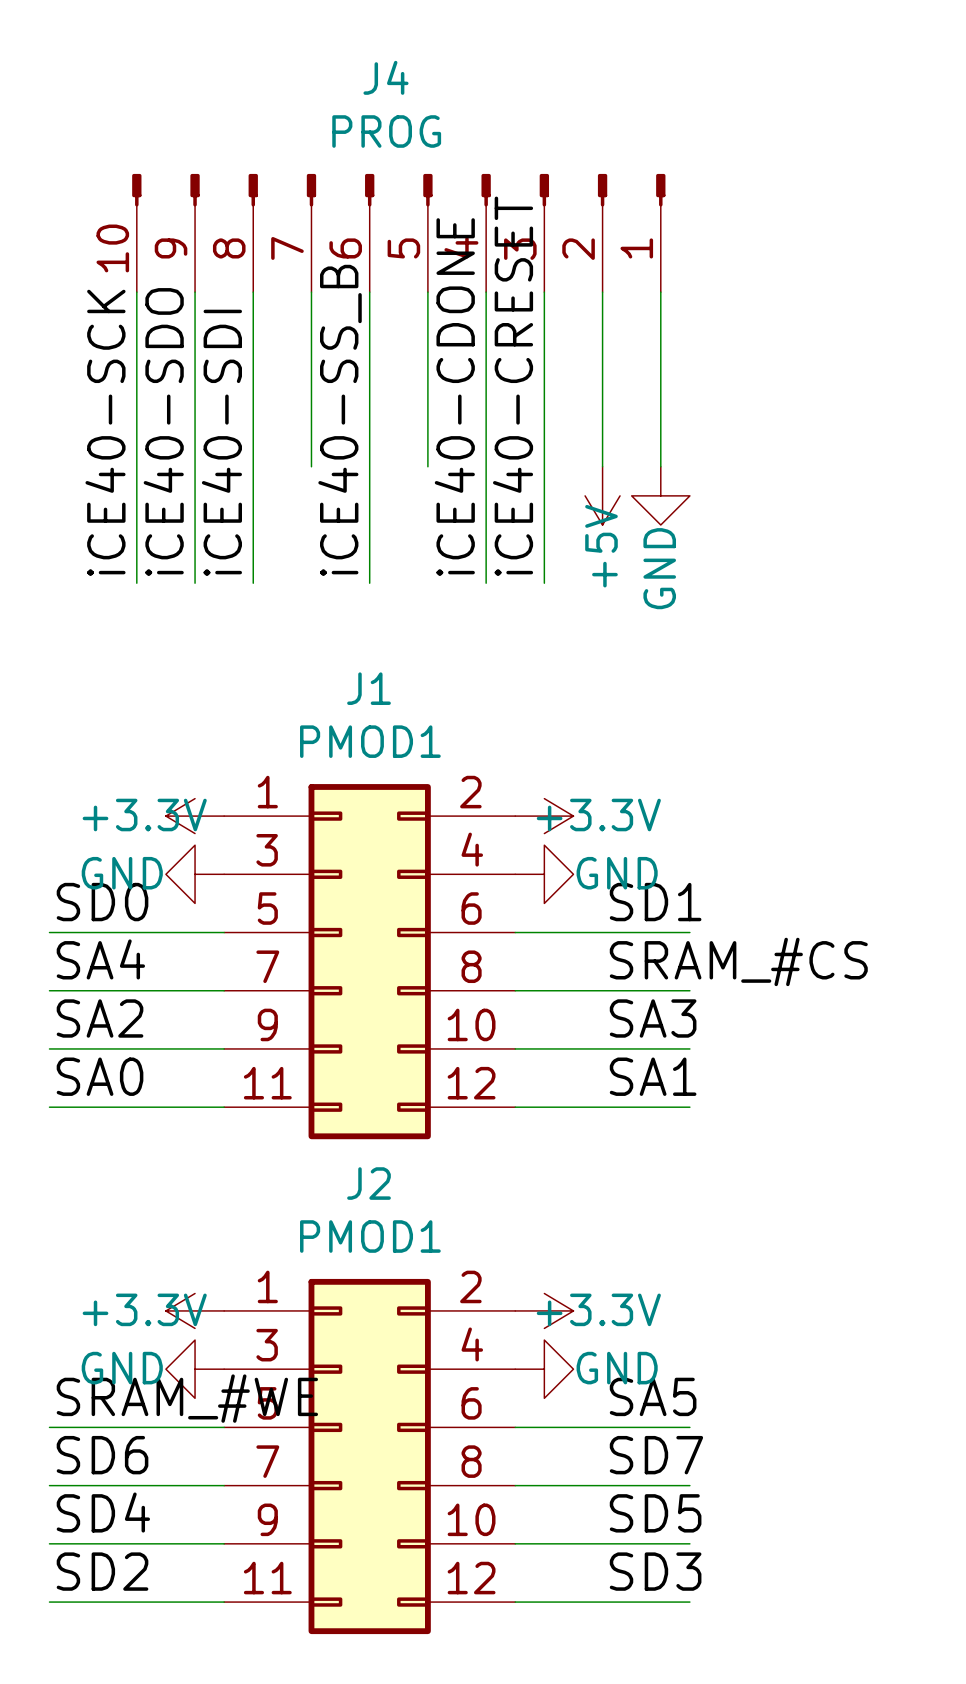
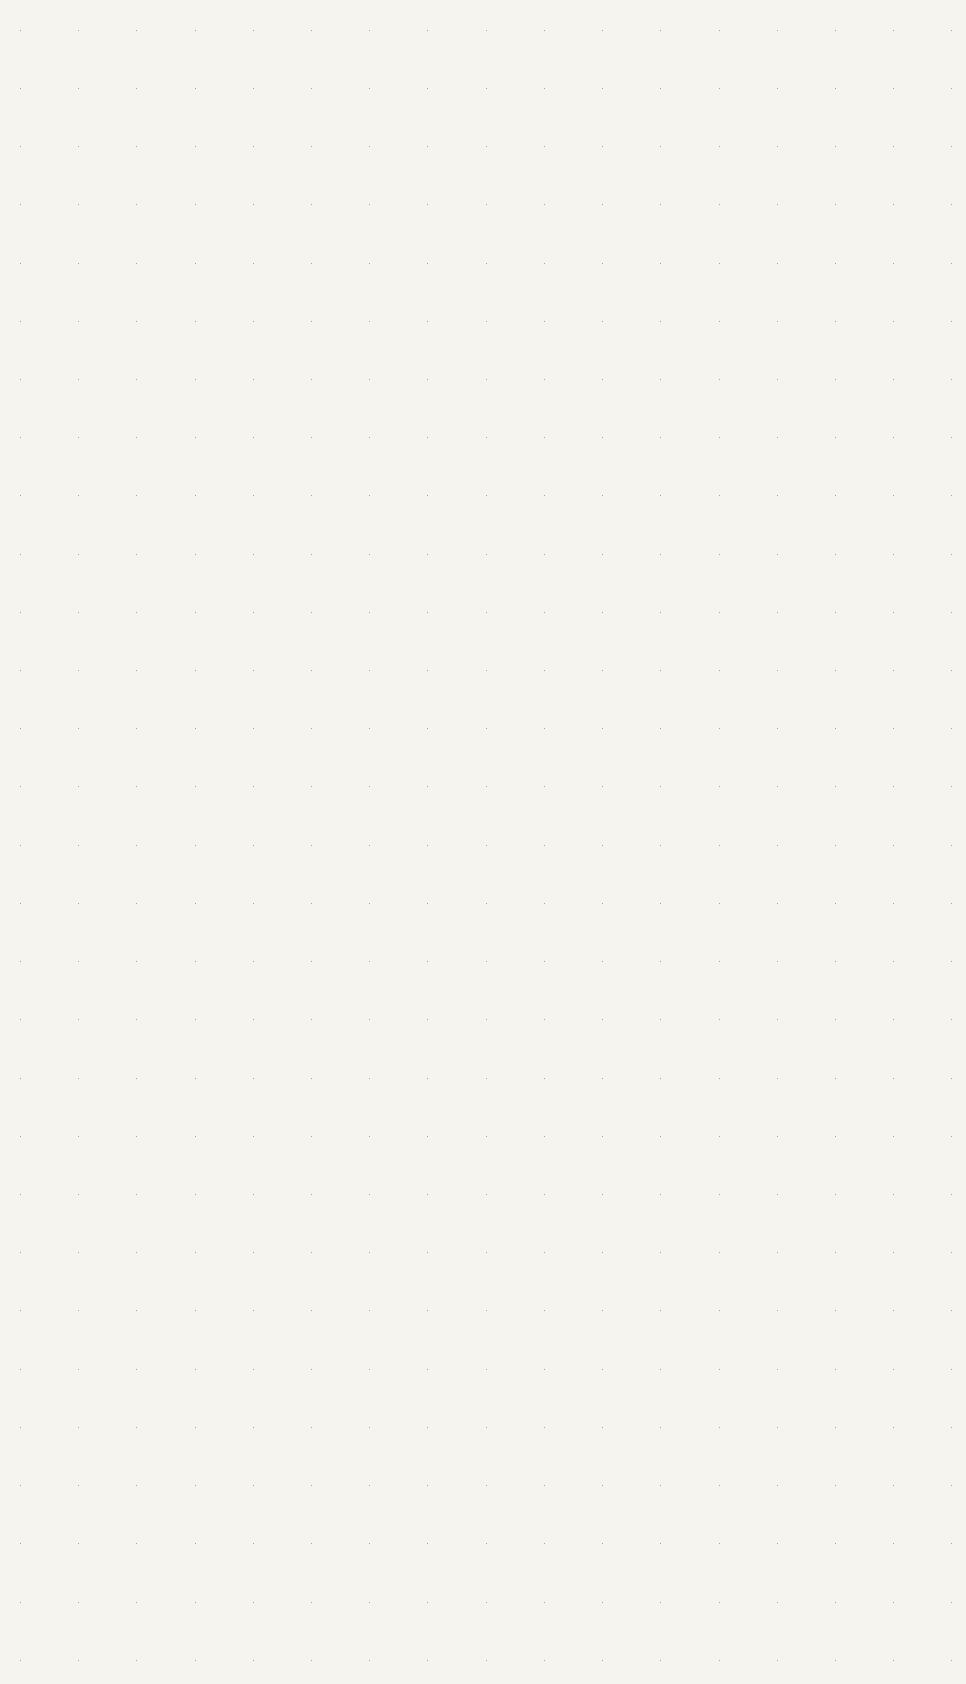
J4: PROG (398, 233) -> none
wire: (136, 292) (136, 583) -> none
wire: (195, 292) (195, 583) -> none
wire: (253, 292) (253, 583) -> none
wire: (311, 292) (311, 466) -> none
wire: (369, 292) (369, 583) -> none
wire: (427, 292) (427, 466) -> none
wire: (486, 292) (486, 583) -> none
wire: (544, 292) (544, 583) -> none
wire: (602, 292) (602, 466) -> none
wire: (660, 292) (660, 466) -> none
label: iCE40-CRESET (513, 386) -> none
label: iCE40-CDONE (454, 397) -> none
label: iCE40-SS_B (340, 420) -> none
label: iCE40-SCK (105, 432) -> none
label: iCE40-SDO (163, 432) -> none
label: iCE40-SDI (221, 442) -> none
power symbol: +5V (602, 495) -> none
power symbol: GND (660, 495) -> none
power symbol: +3.3V (195, 816) -> none
power symbol: +3.3V (544, 816) -> none
power symbol: GND (195, 874) -> none
power symbol: GND (544, 874) -> none
label: SD0 (102, 902) -> none
label: SD1 (655, 902) -> none
wire: (49, 932) (224, 932) -> none
wire: (515, 932) (689, 932) -> none
label: SA4 (100, 959) -> none
J1: PMOD1 (369, 961) -> none
label: SRAM_#CS (738, 961) -> none
wire: (49, 990) (224, 990) -> none
wire: (515, 990) (689, 990) -> none
label: SA2 (100, 1018) -> none
label: SA3 (653, 1018) -> none
wire: (49, 1048) (224, 1048) -> none
wire: (515, 1048) (689, 1048) -> none
label: SA0 (100, 1076) -> none
label: SA1 (653, 1076) -> none
wire: (49, 1107) (224, 1107) -> none
wire: (515, 1107) (689, 1107) -> none
power symbol: +3.3V (195, 1310) -> none
power symbol: +3.3V (544, 1310) -> none
power symbol: GND (195, 1369) -> none
power symbol: GND (544, 1369) -> none
label: SA5 (653, 1396) -> none
label: SRAM_#WE (187, 1398) -> none
wire: (49, 1427) (224, 1427) -> none
wire: (515, 1427) (689, 1427) -> none
label: SD6 (102, 1455) -> none
label: SD7 (656, 1455) -> none
J2: PMOD1 (369, 1456) -> none
wire: (49, 1485) (224, 1485) -> none
wire: (515, 1485) (689, 1485) -> none
label: SD4 (103, 1512) -> none
label: SD5 (655, 1513) -> none
wire: (49, 1543) (224, 1543) -> none
wire: (515, 1543) (689, 1543) -> none
label: SD2 (102, 1571) -> none
label: SD3 (655, 1571) -> none
wire: (49, 1602) (224, 1602) -> none
wire: (515, 1602) (689, 1602) -> none

